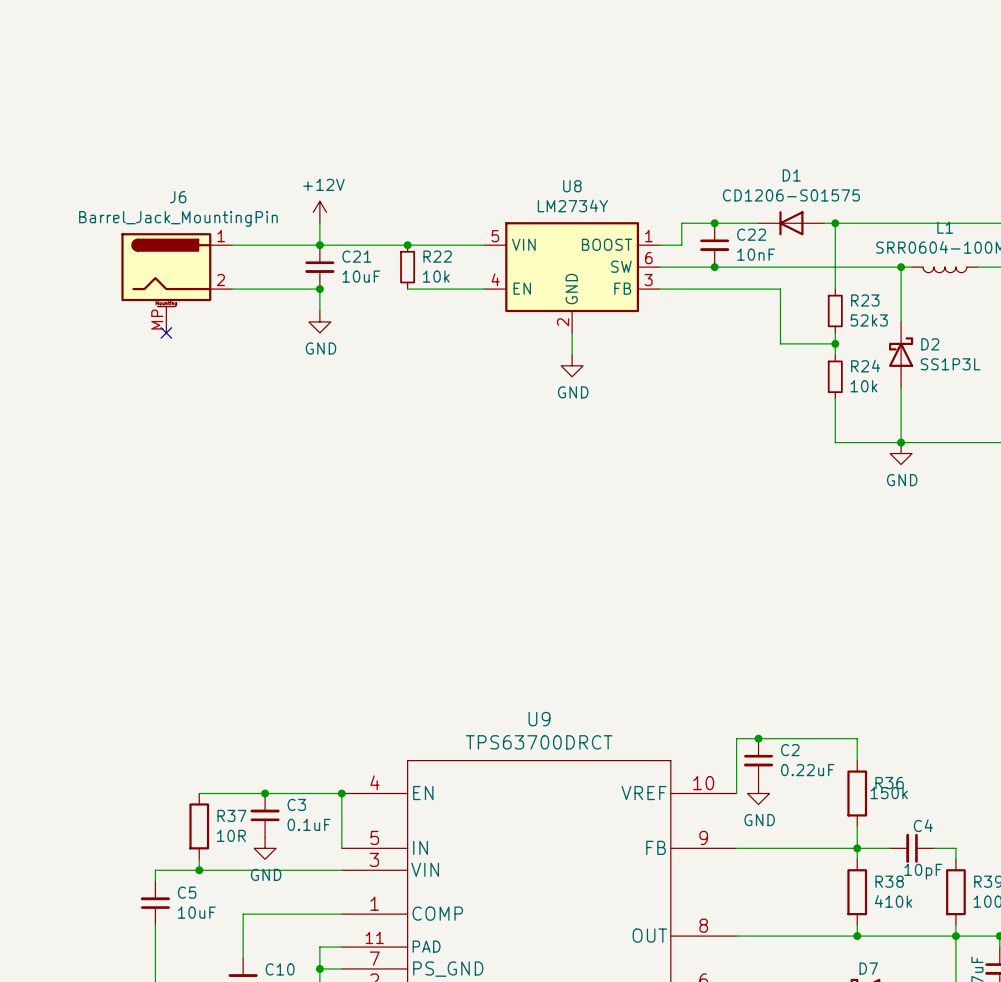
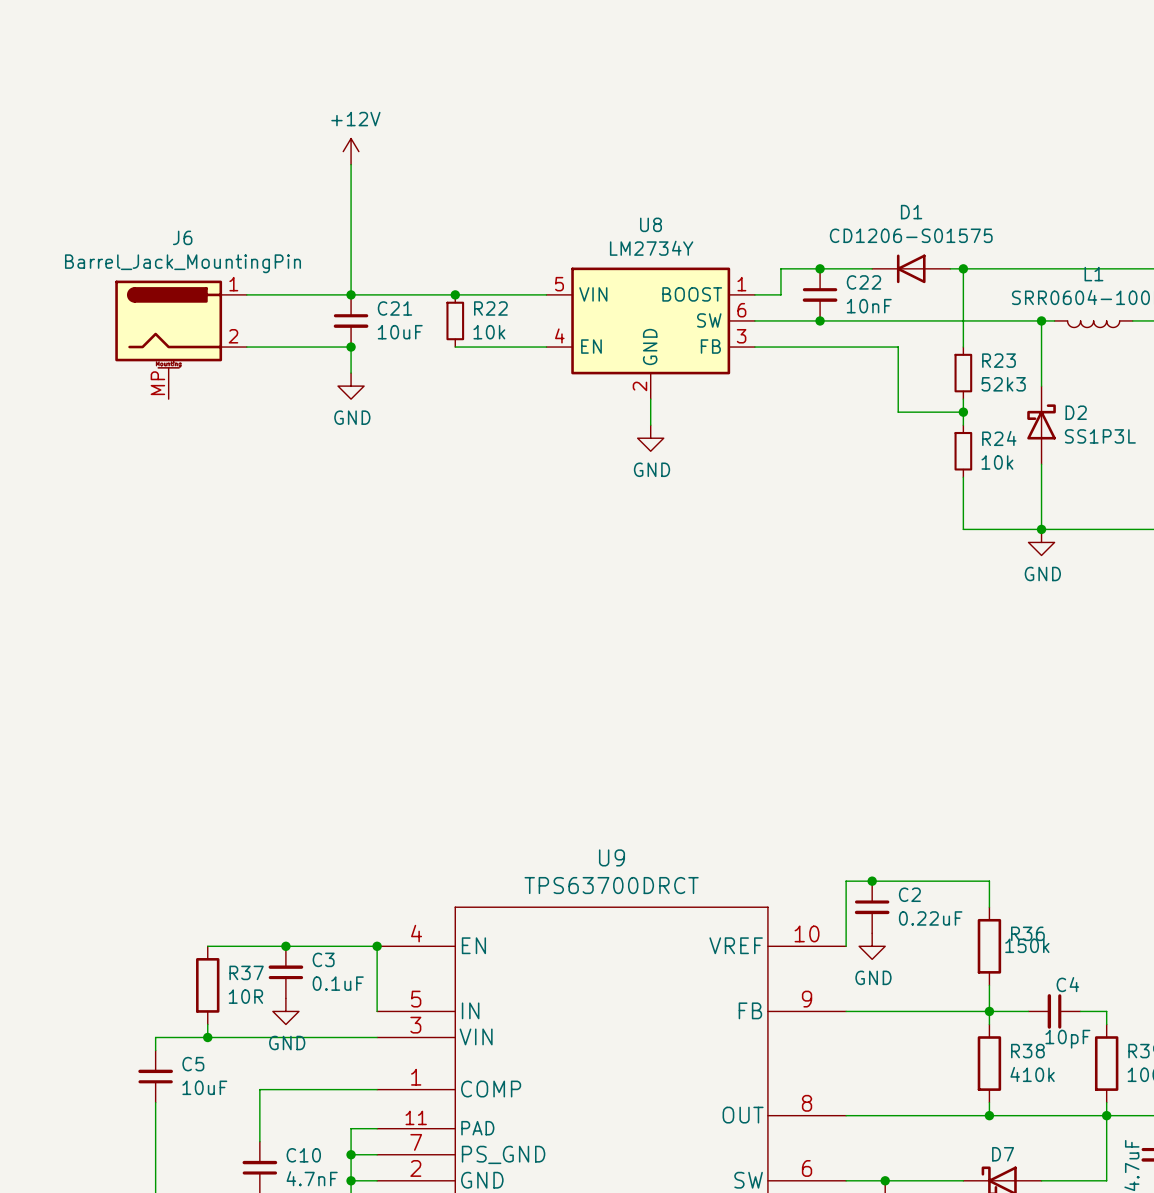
wire: none -> (351, 164) (351, 268)
power symbol position: +12V (319, 212) -> +12V (351, 151)
no-connect mark: (166, 332) -> none

